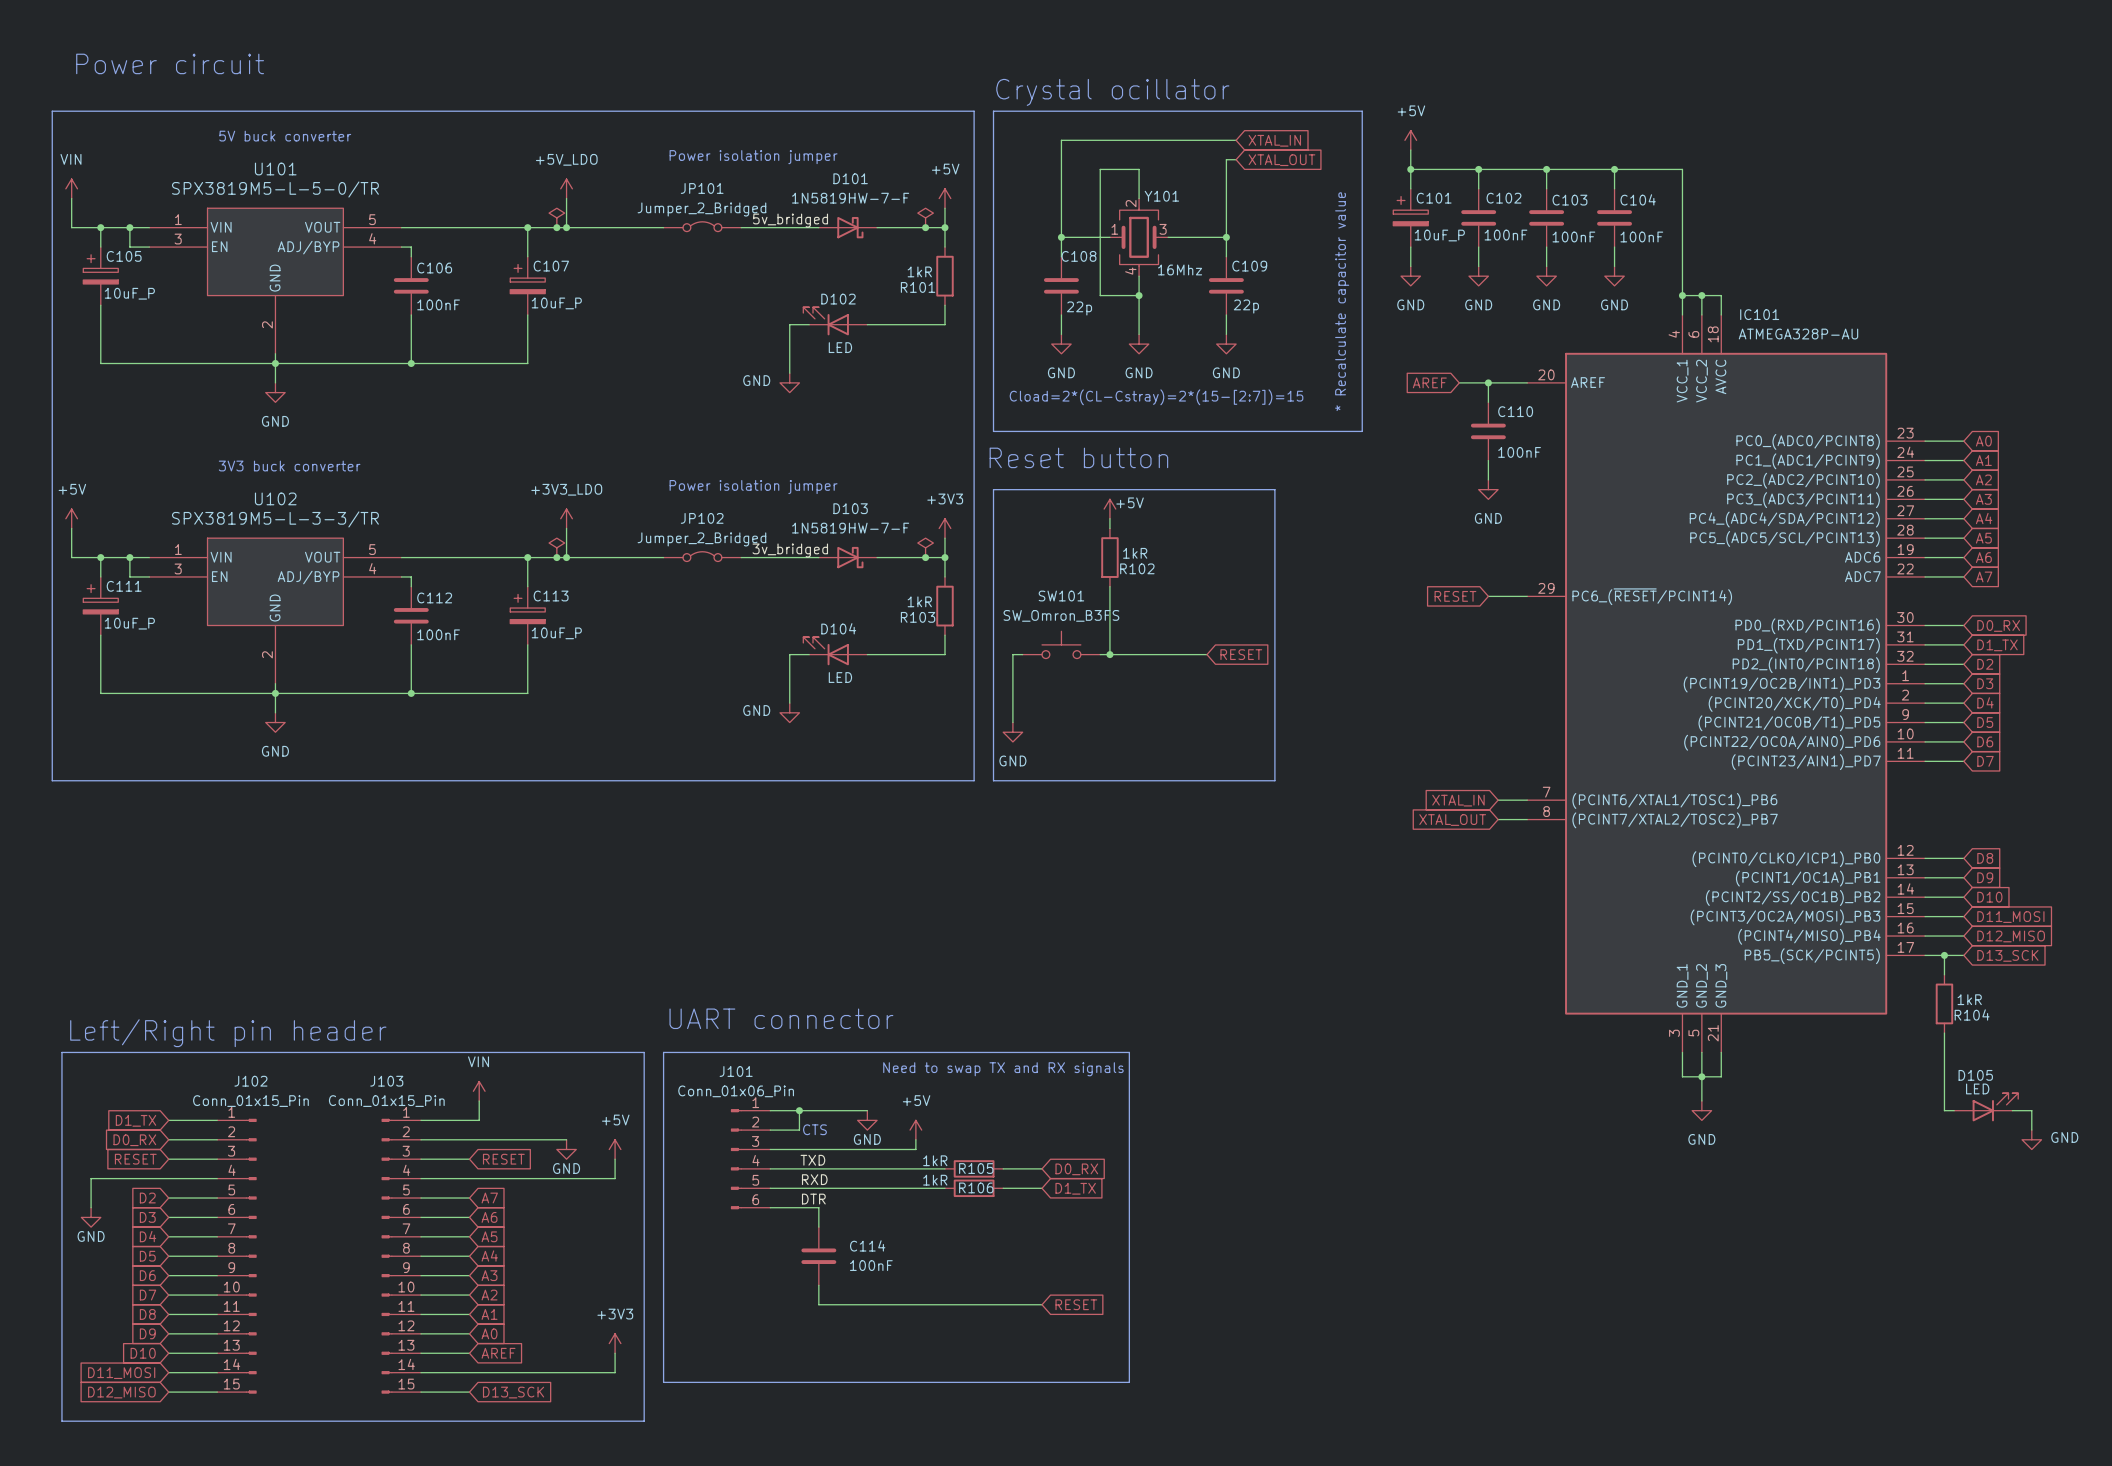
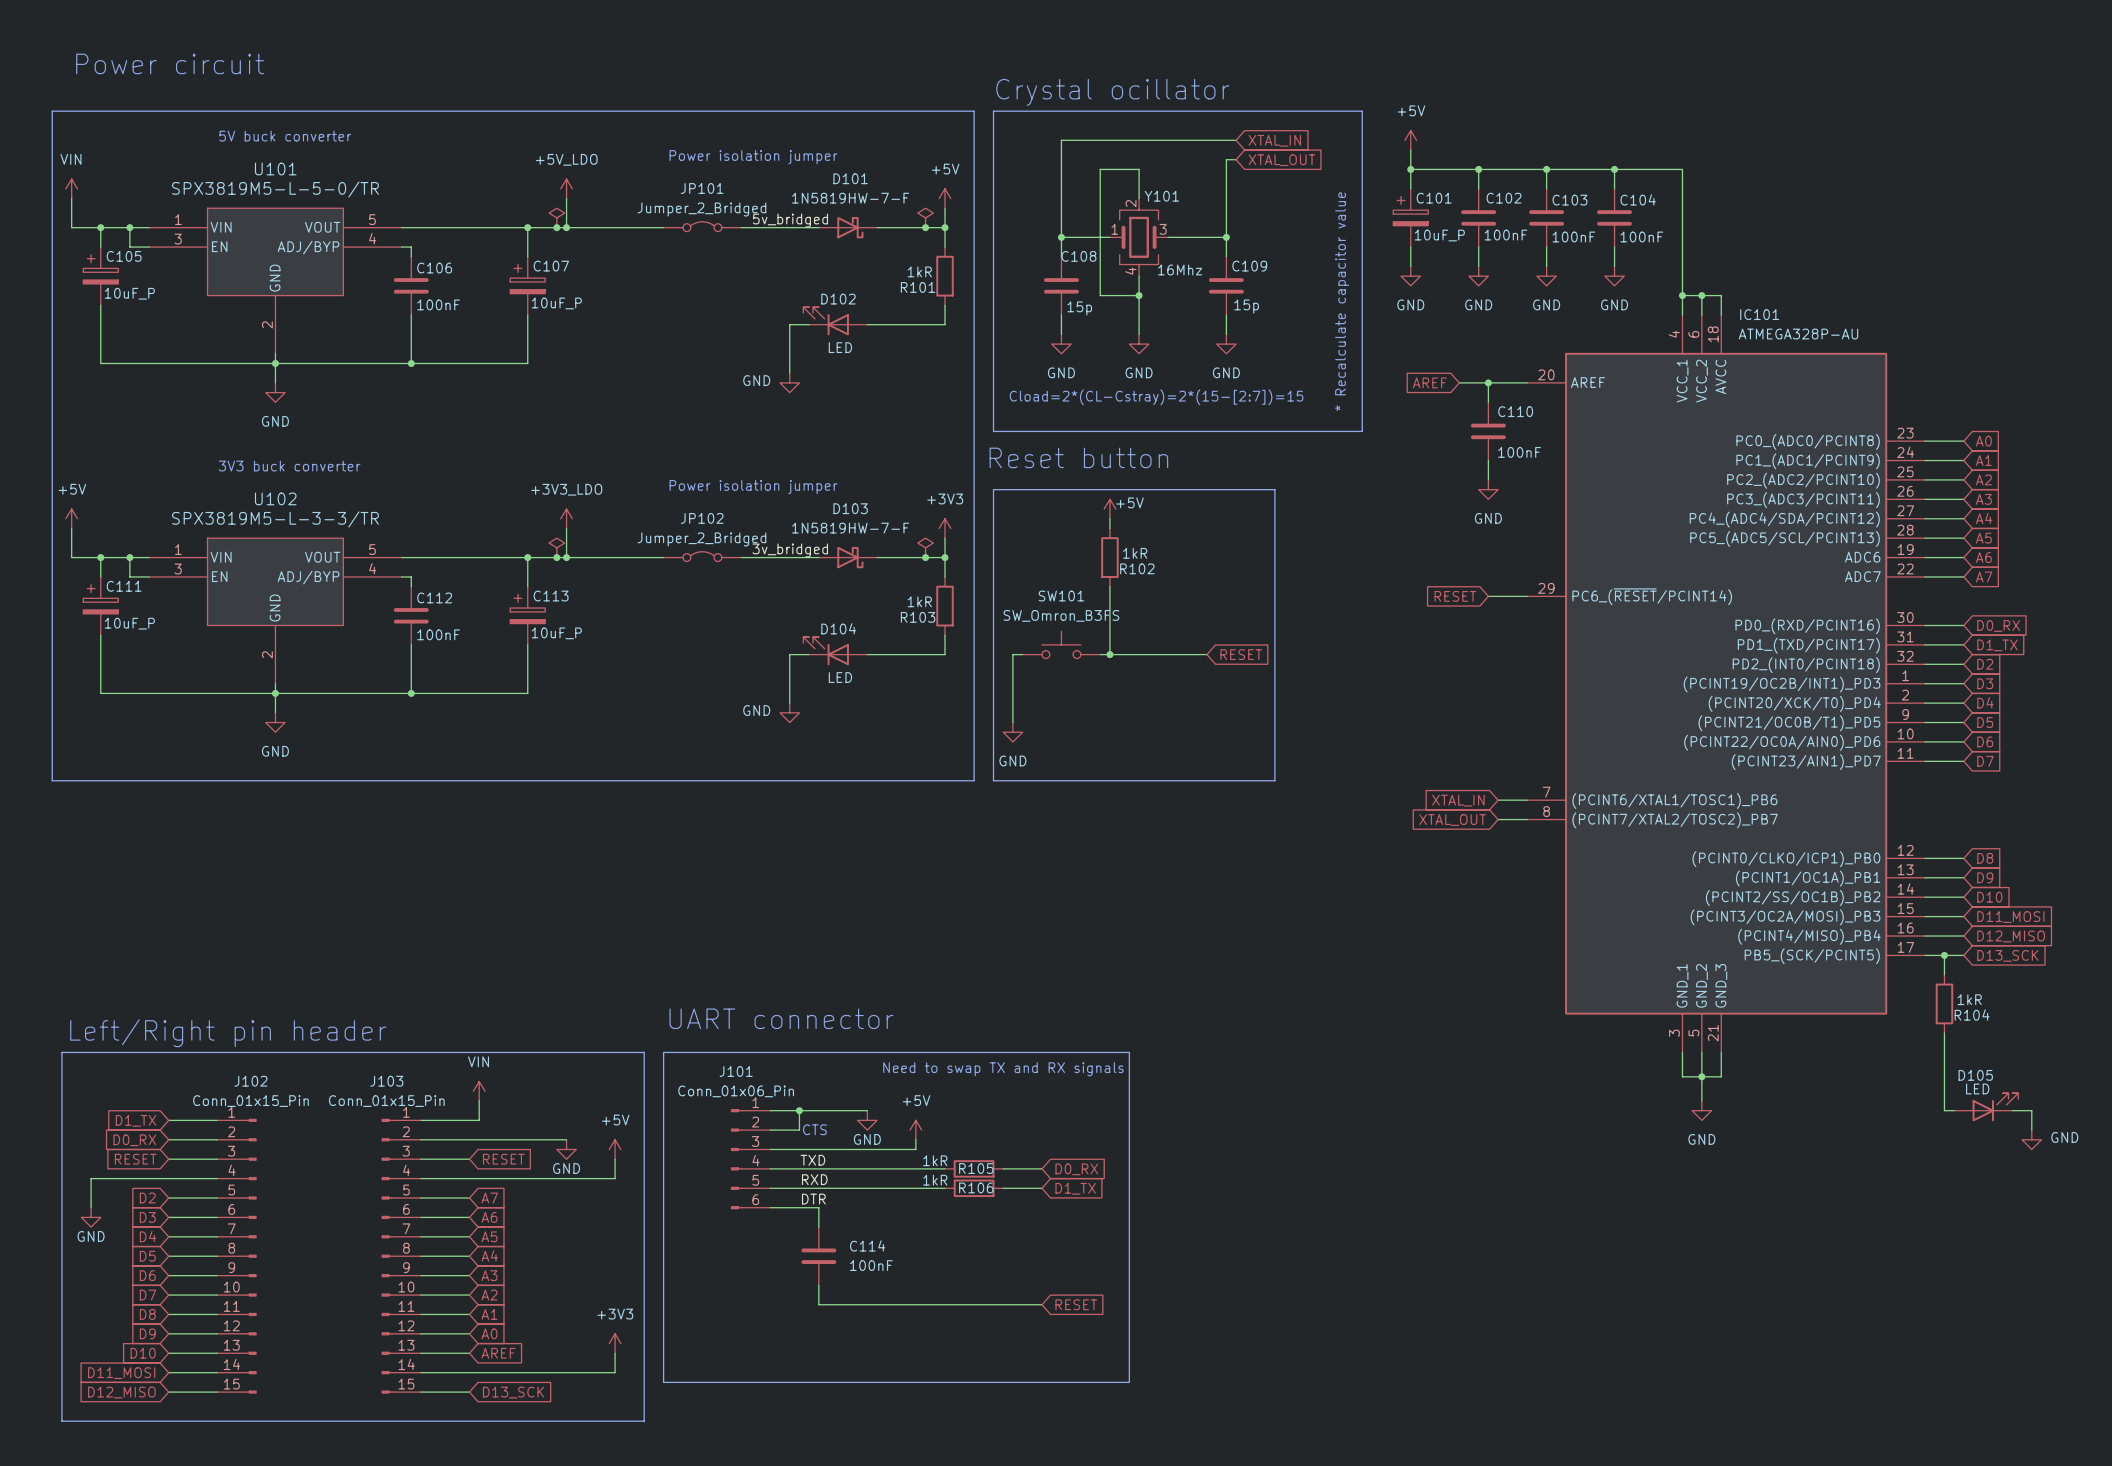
C109 value: 22p (1246, 306) -> 15p (1246, 306)
C108 value: 22p (1079, 308) -> 15p (1079, 308)

